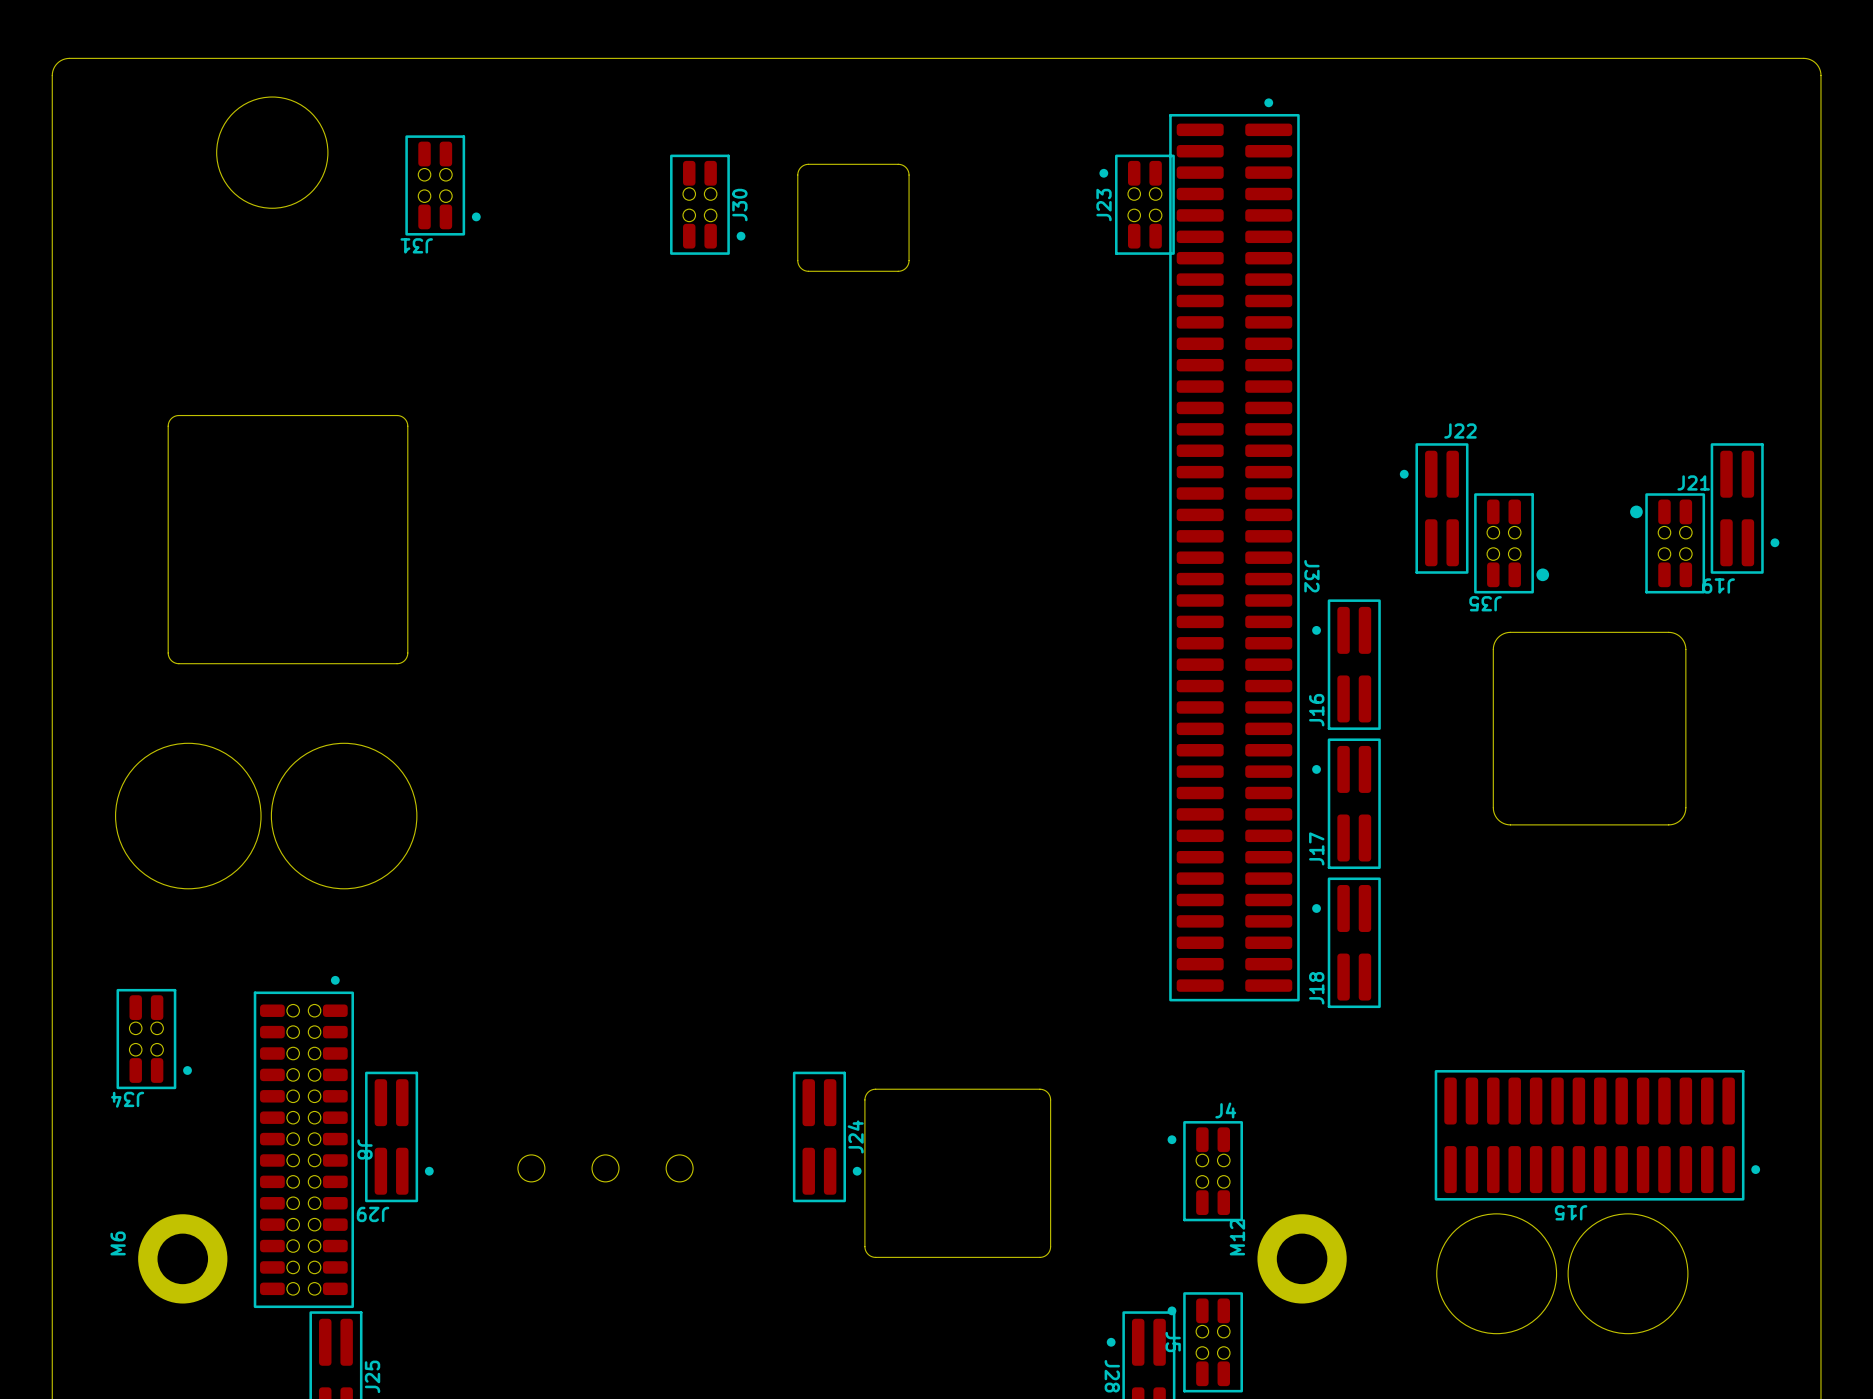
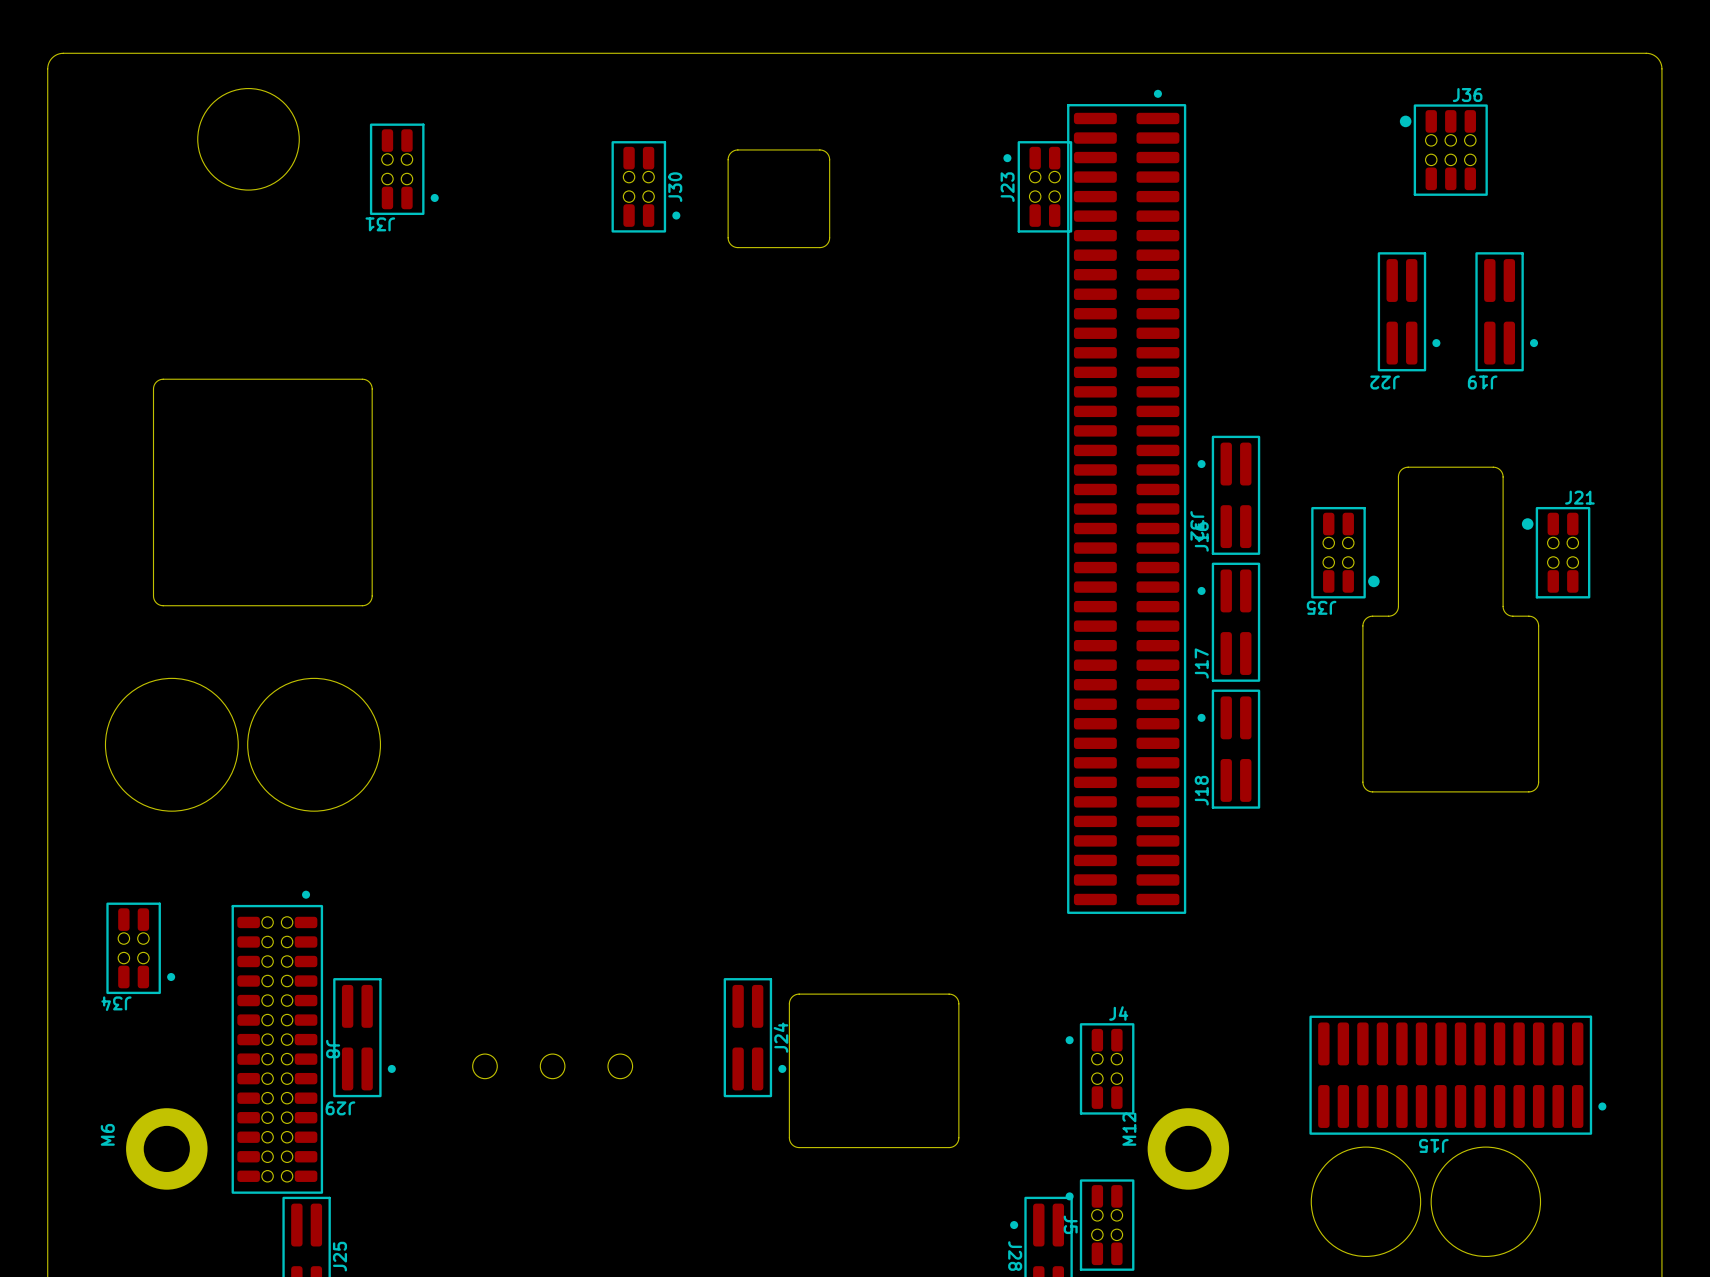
J36: none -> (1443, 150)
J22 rotation: 0° (1434, 508) -> 180° (1409, 311)
J22 position: (1434, 508) -> (1409, 311)
J19 position: (1744, 508) -> (1506, 311)
drawing: none -> [1311, 466, 1541, 1257]
J35 position: (1511, 543) -> (1345, 552)
J21 position: (1667, 543) -> (1556, 552)
drawing: [1436, 631, 1689, 1335] -> none
J16 position: (1346, 664) -> (1228, 495)
J17 position: (1346, 803) -> (1228, 622)
J18 position: (1346, 942) -> (1228, 749)
J15 position: (1597, 1135) -> (1457, 1075)

